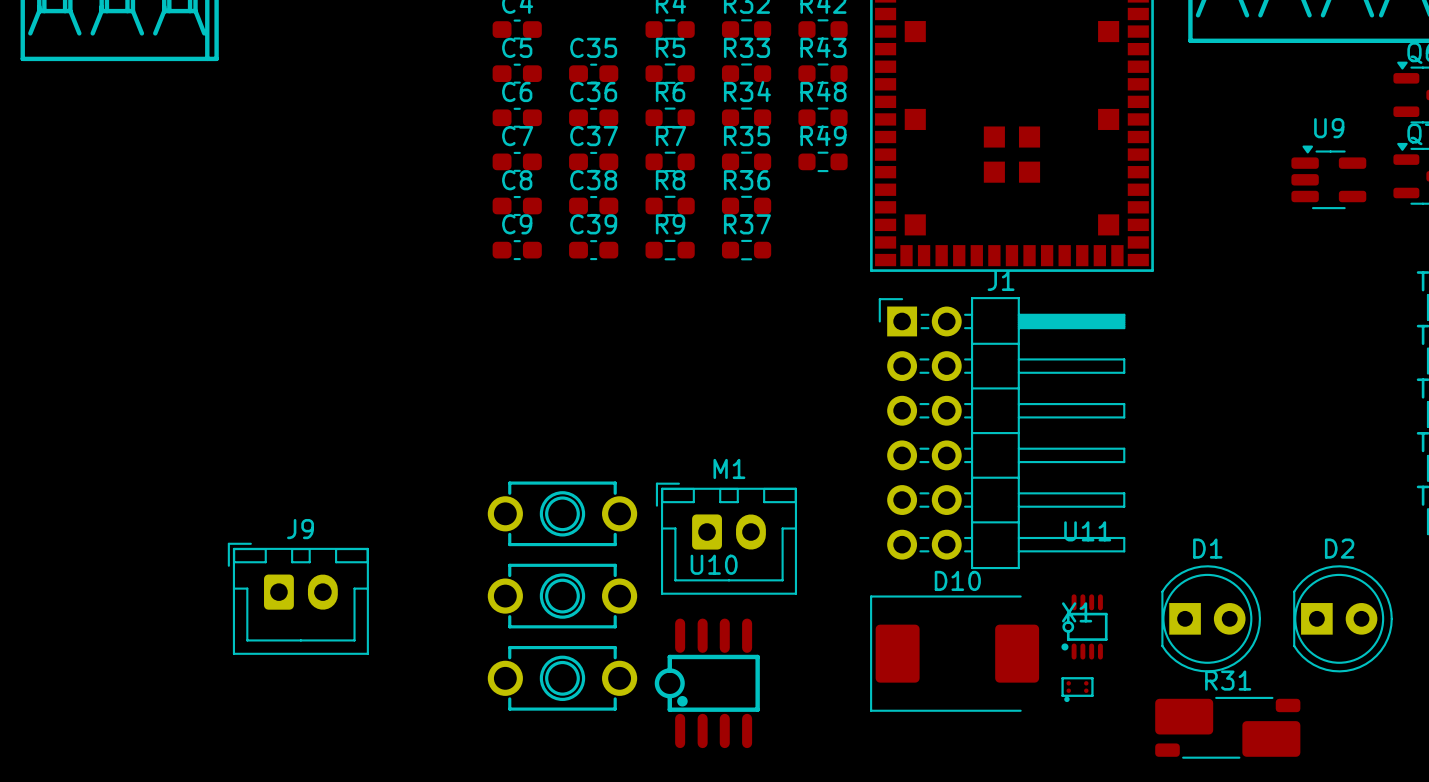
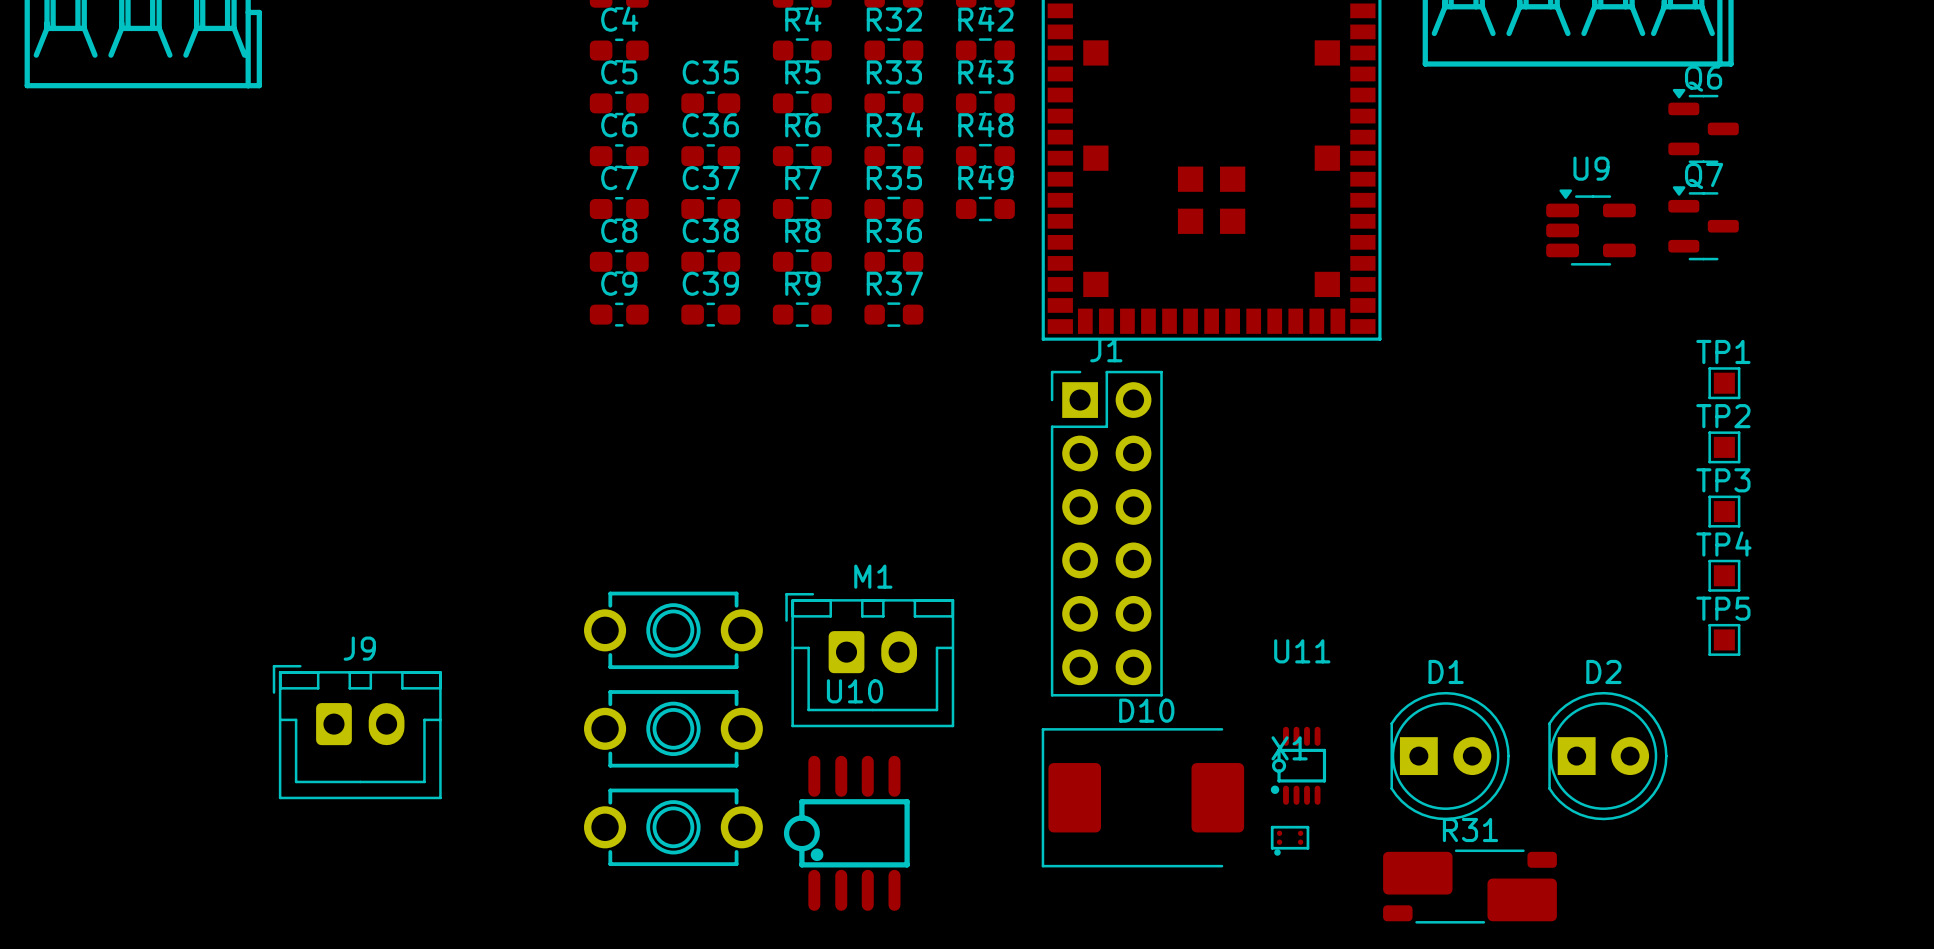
J1 footprint: [878, 297, 1126, 570] -> [1050, 370, 1163, 697]

